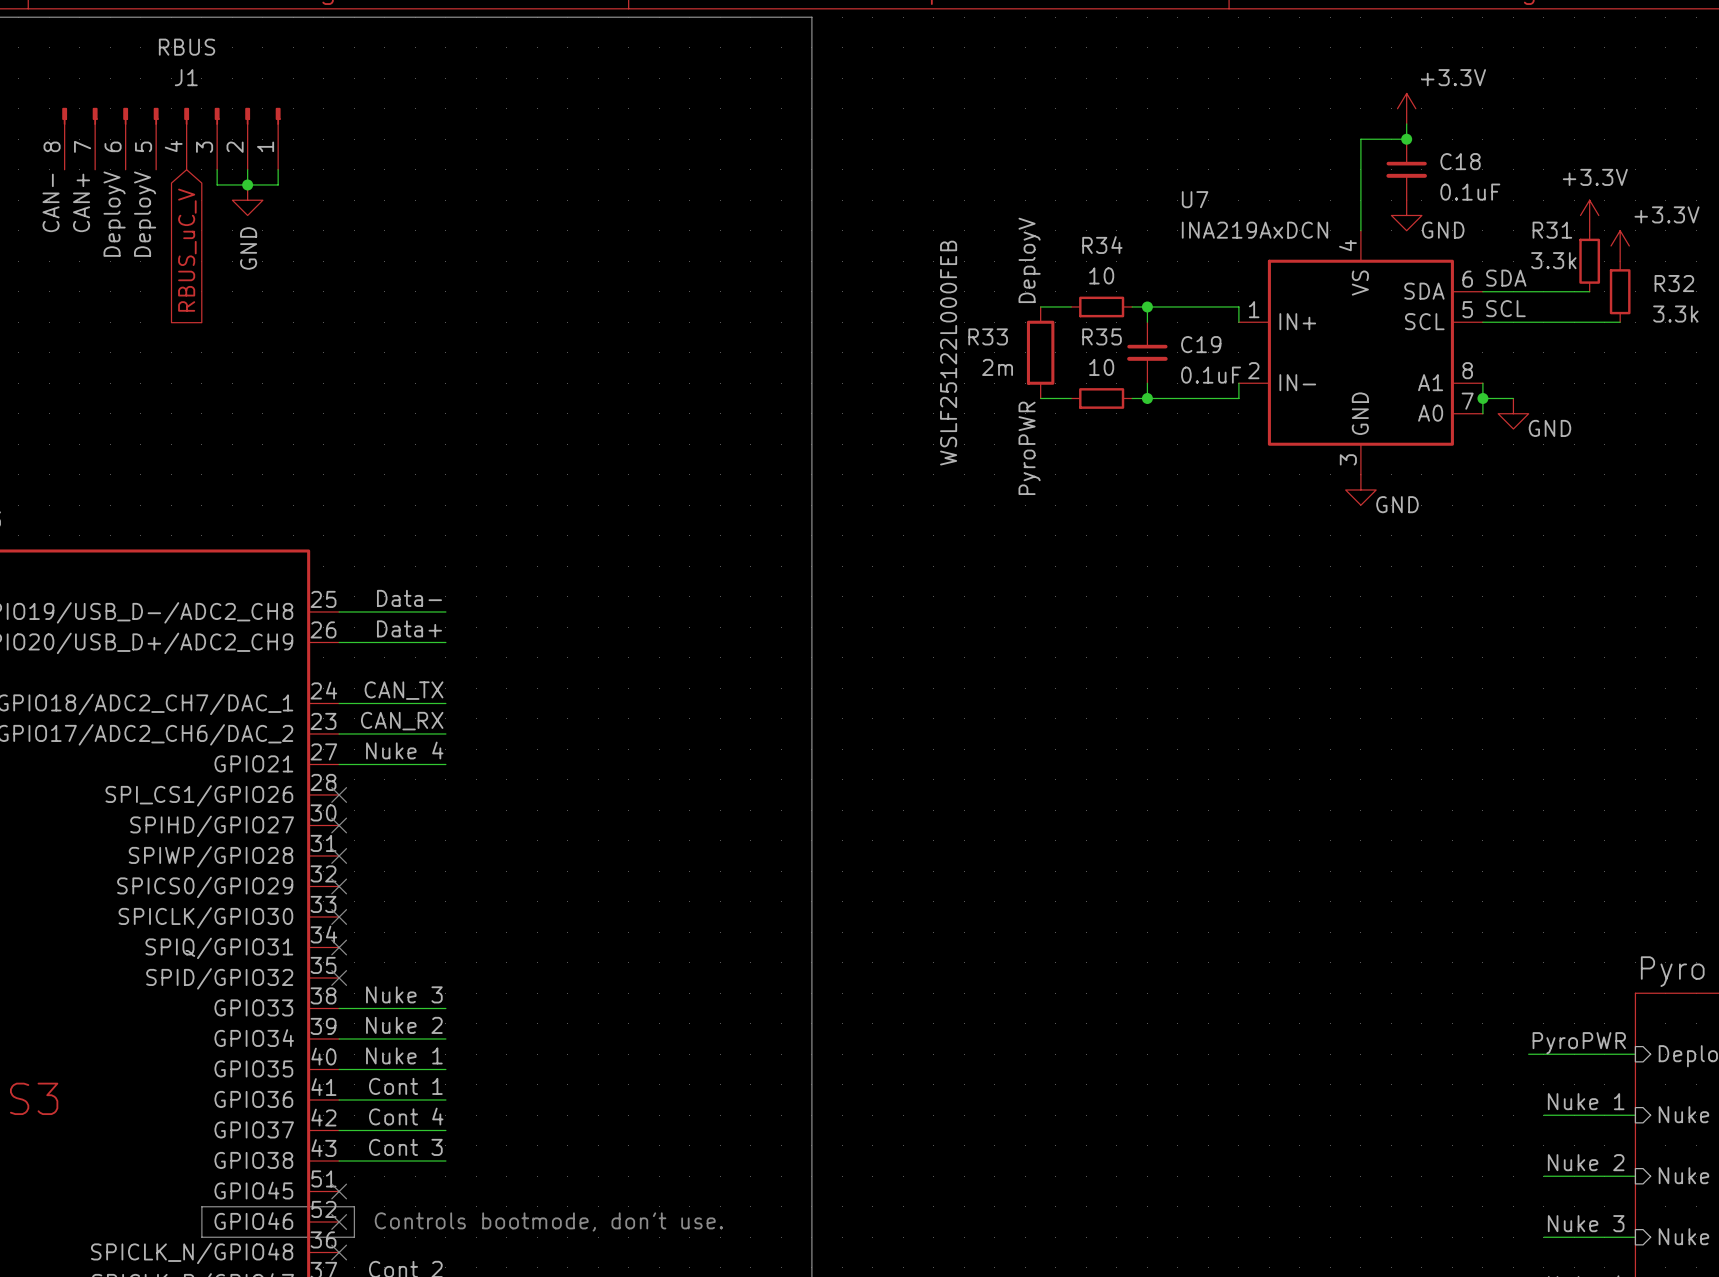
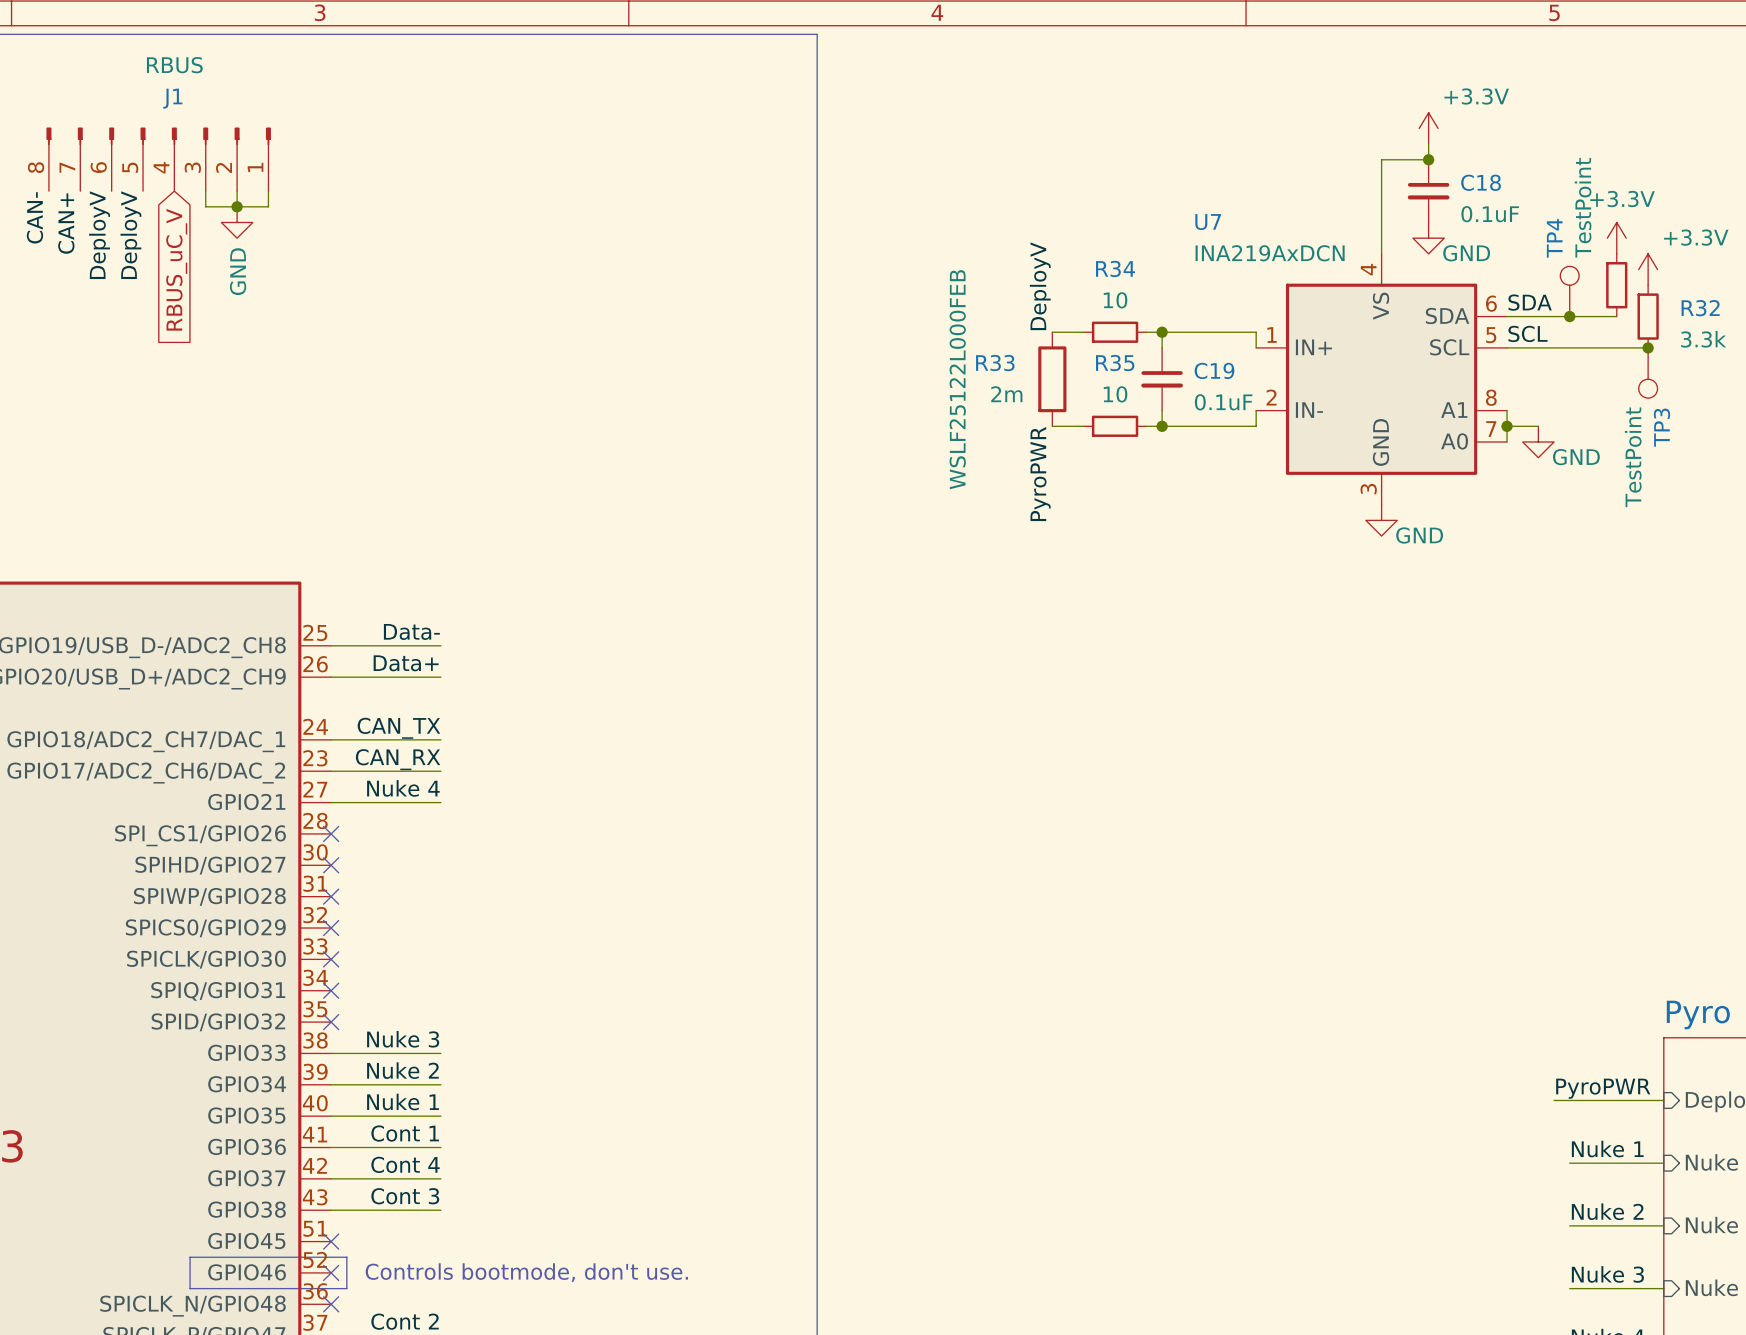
R31 name: R31 (1552, 230) -> none
R31 value: 3.3k (1553, 260) -> none
TP4: none -> TestPoint (1569, 291)
junction: none -> (1569, 316)
junction: none -> (1648, 347)
TP3: none -> TestPoint (1648, 373)

